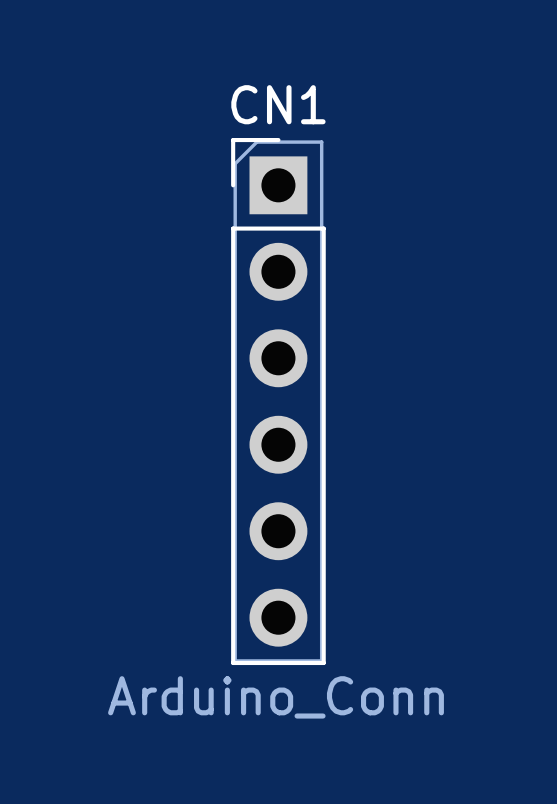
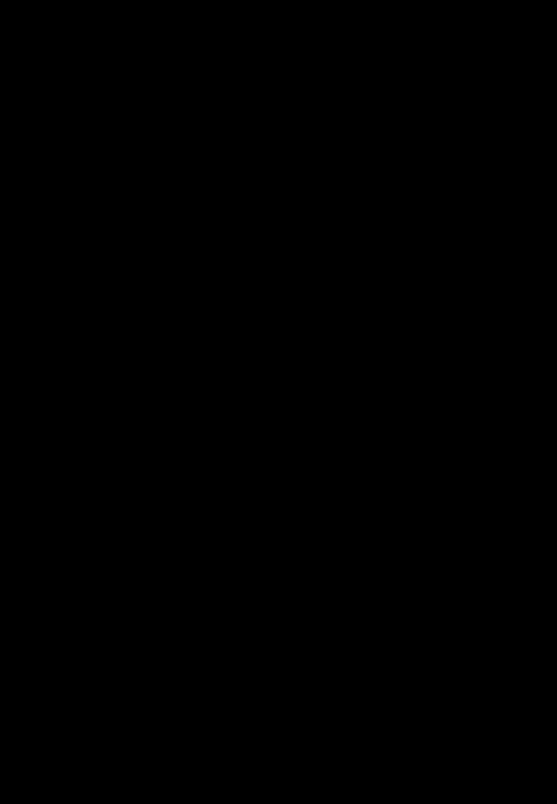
CN1: Arduino_Conn (278, 401) -> none

